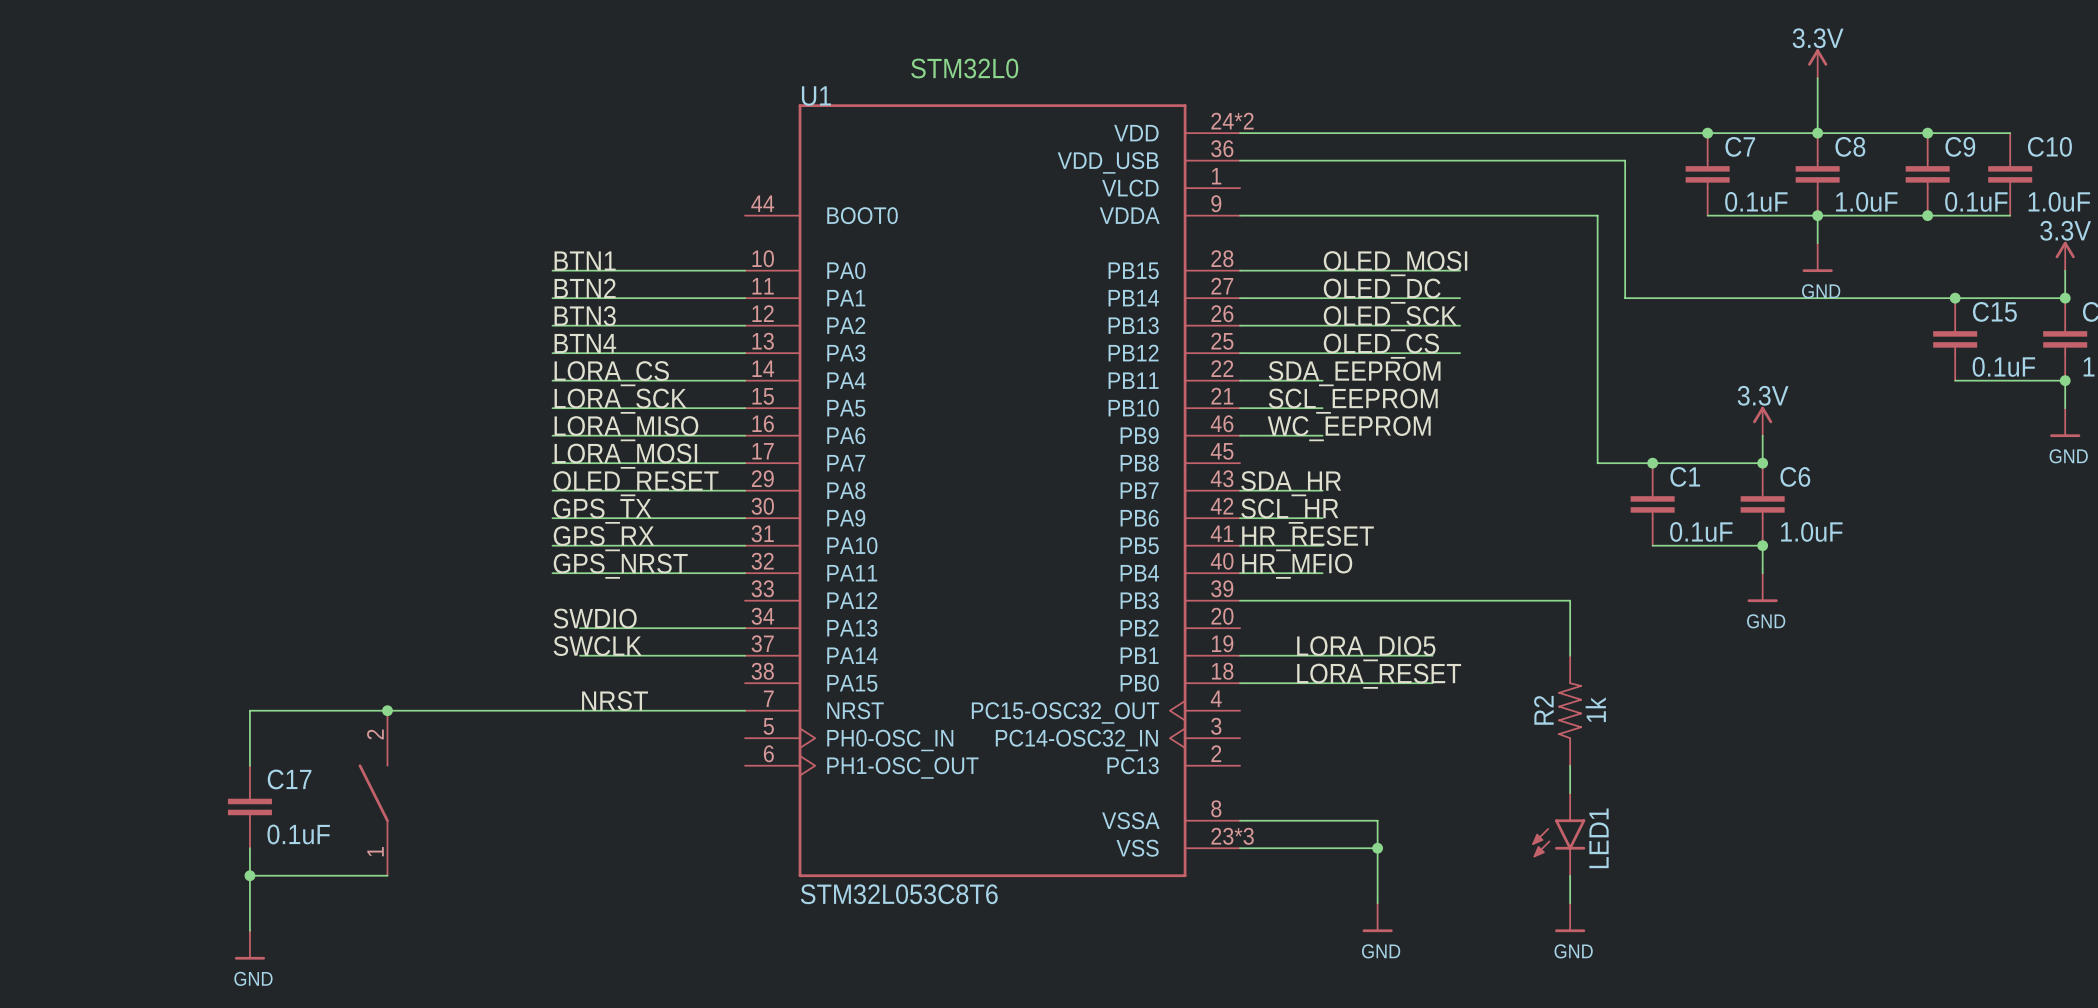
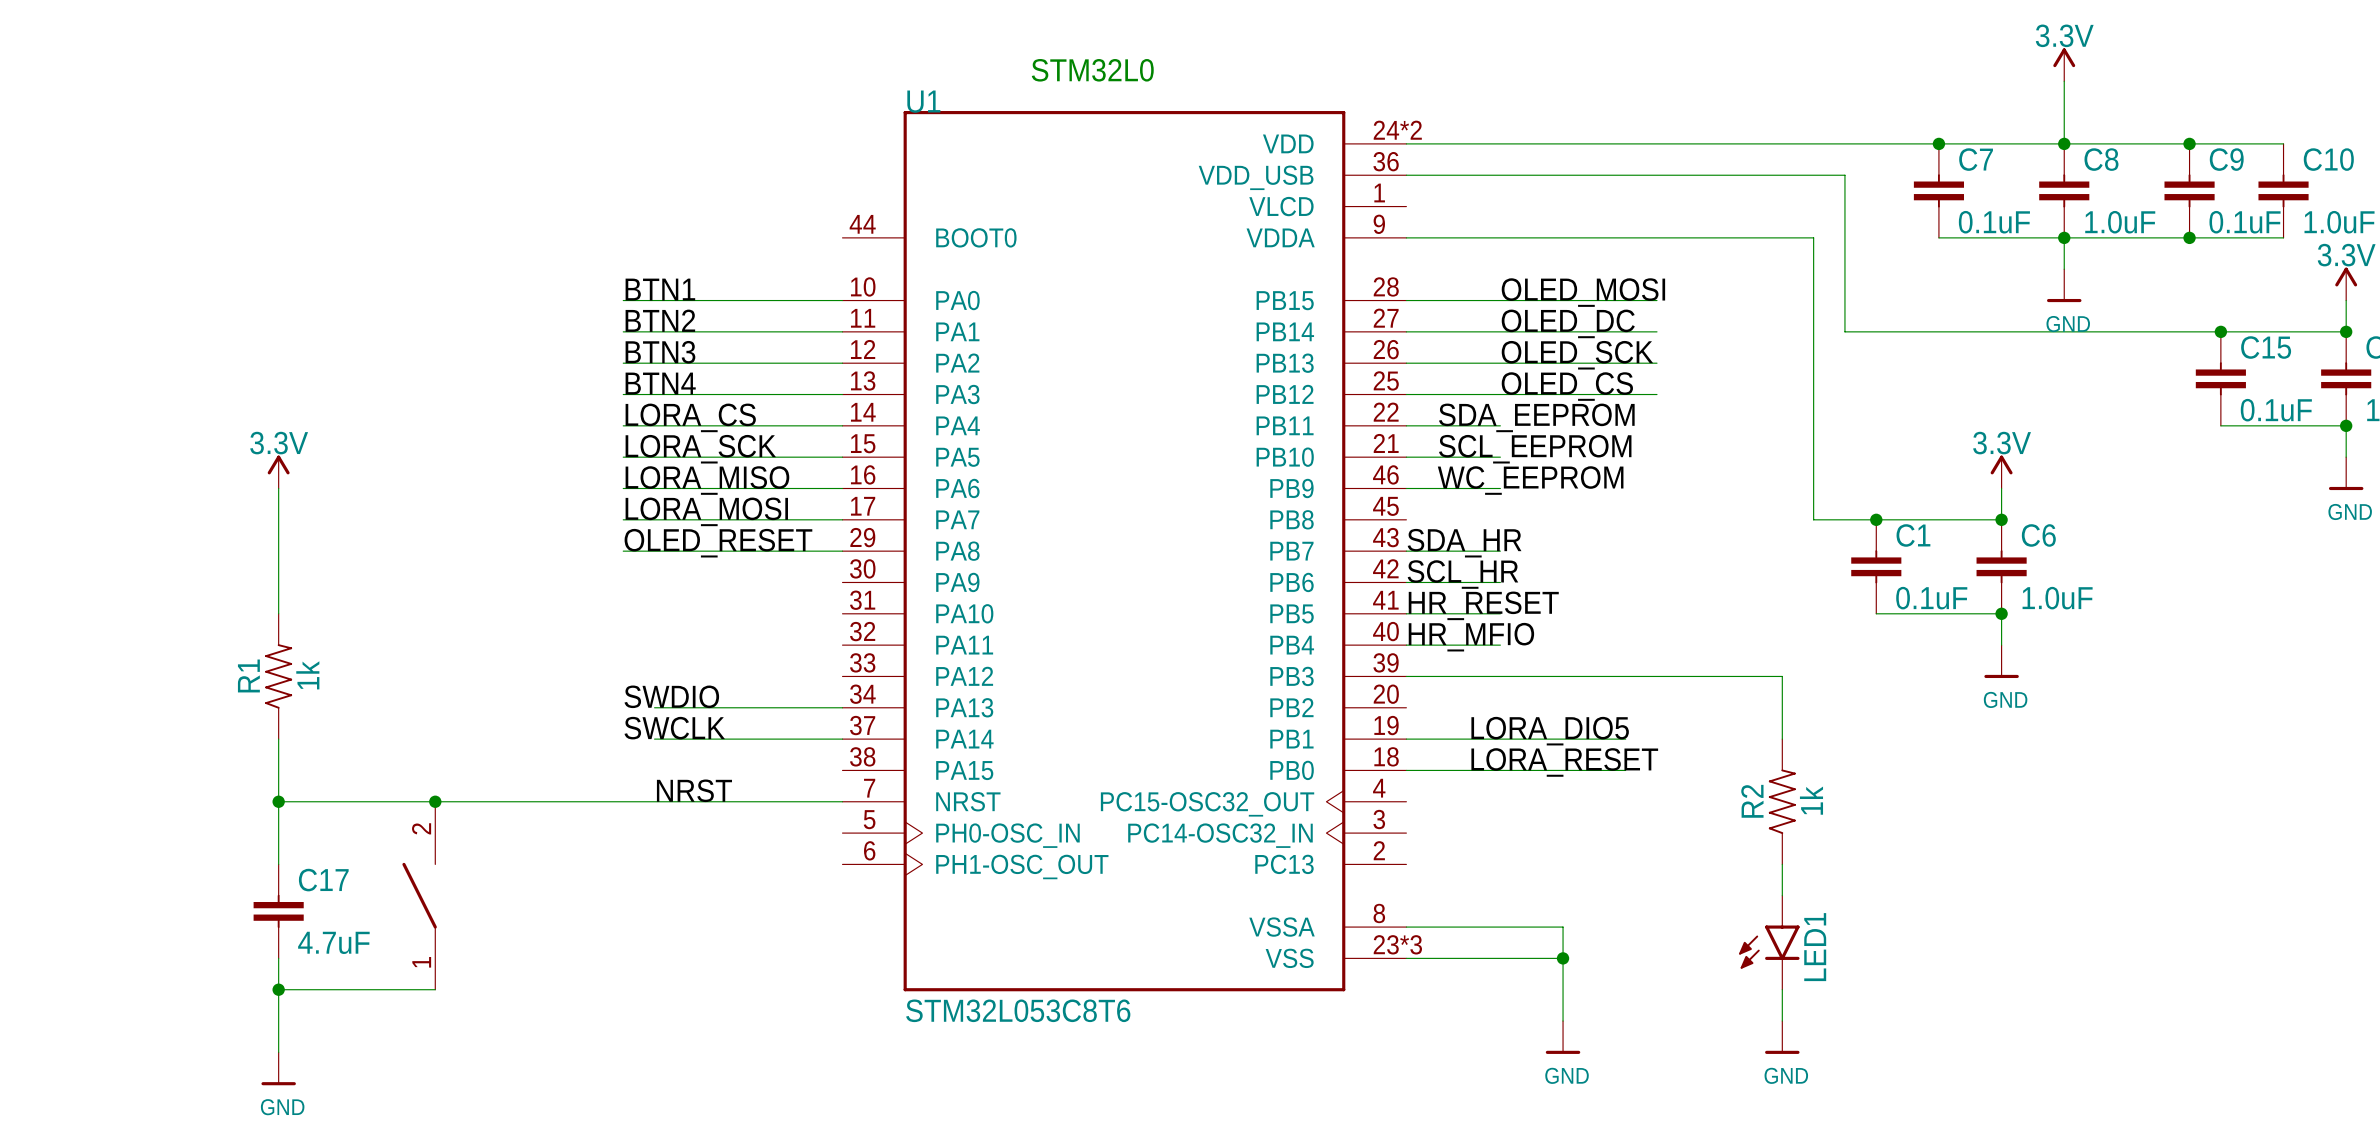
power symbol: none -> 3.3V (278, 472)
wire: none -> (278, 488) (278, 613)
label: GPS_TX (602, 511) -> none
wire: (552, 518) (745, 518) -> none
label: GPS_RX (603, 538) -> none
wire: (552, 545) (745, 545) -> none
label: GPS_NRST (620, 566) -> none
wire: (552, 573) (745, 573) -> none
R1: none -> 1k (278, 676)
wire: none -> (278, 739) (278, 801)
junction: none -> (278, 801)
C17 value: 0.1uF (298, 834) -> 4.7uF (333, 942)

